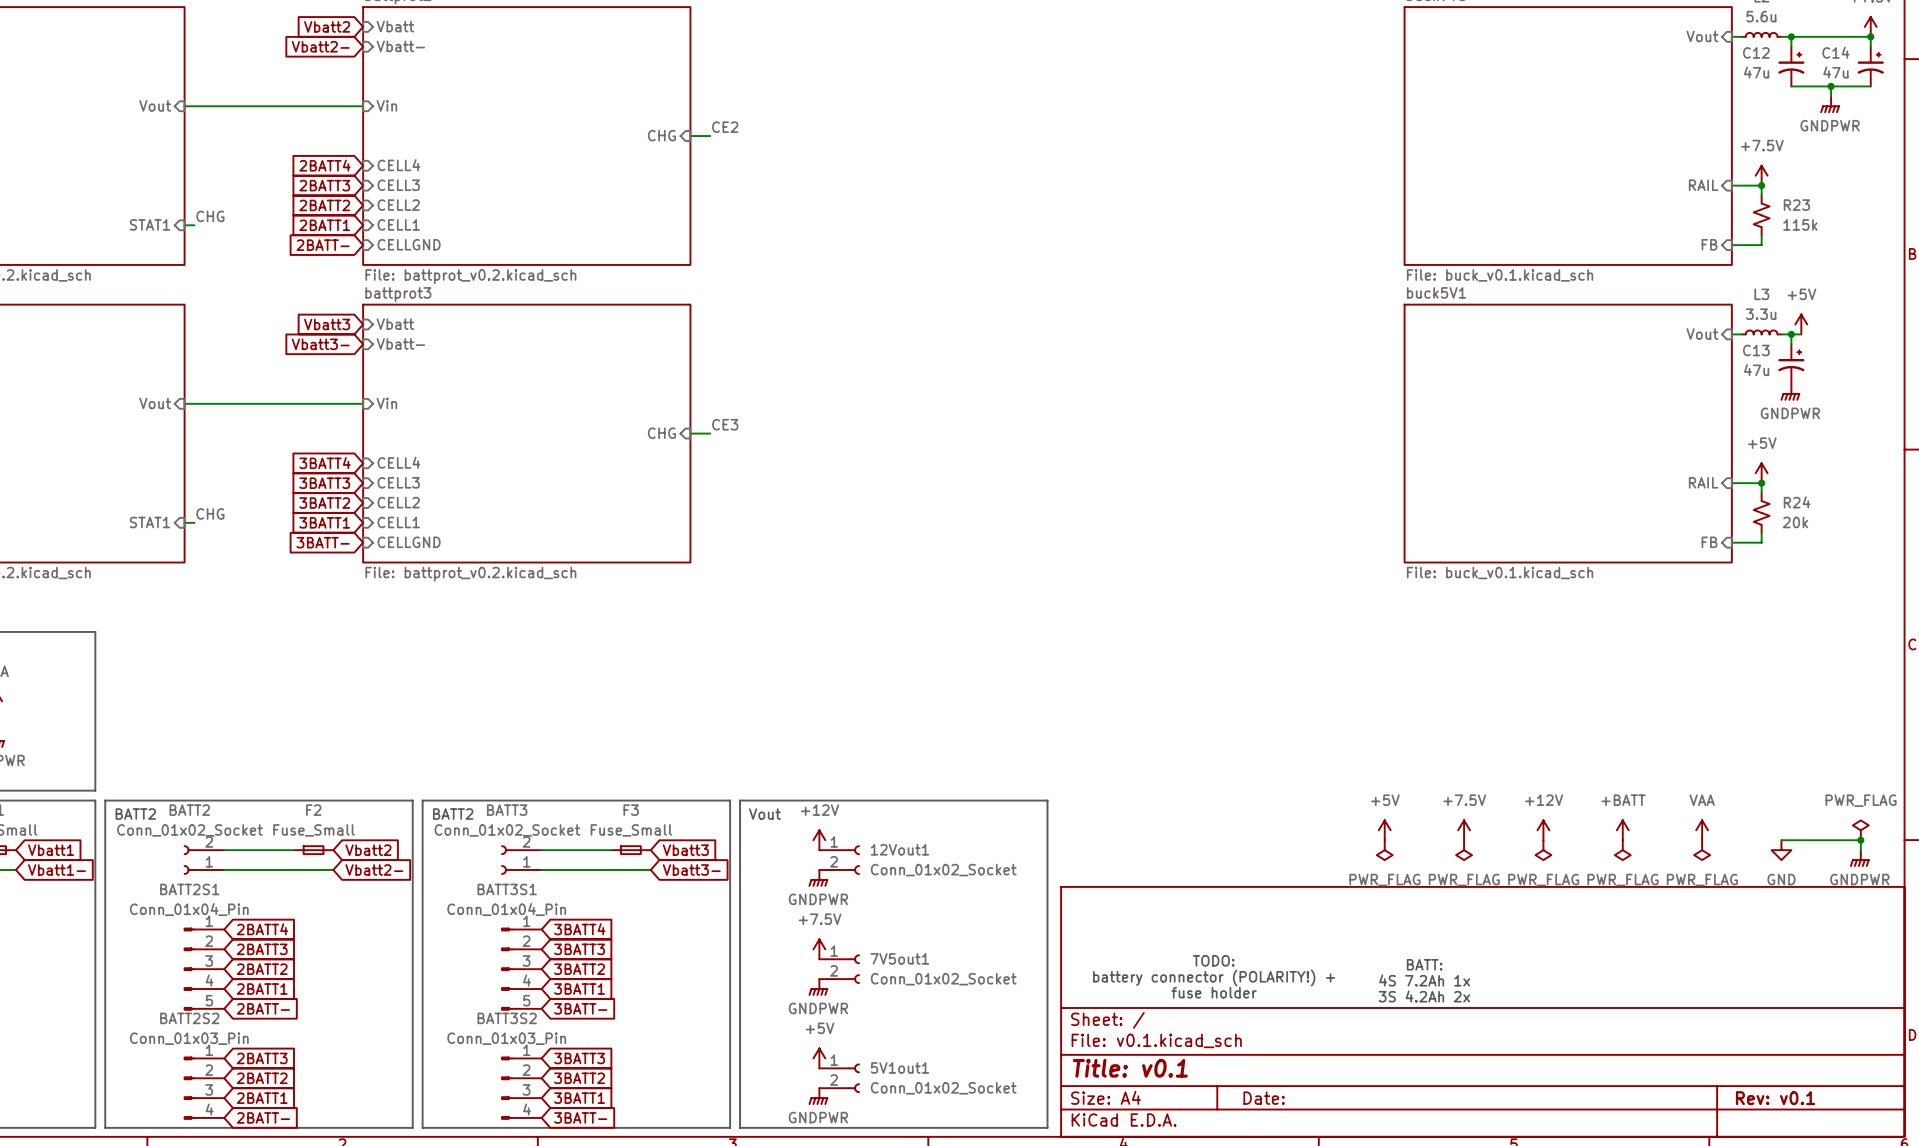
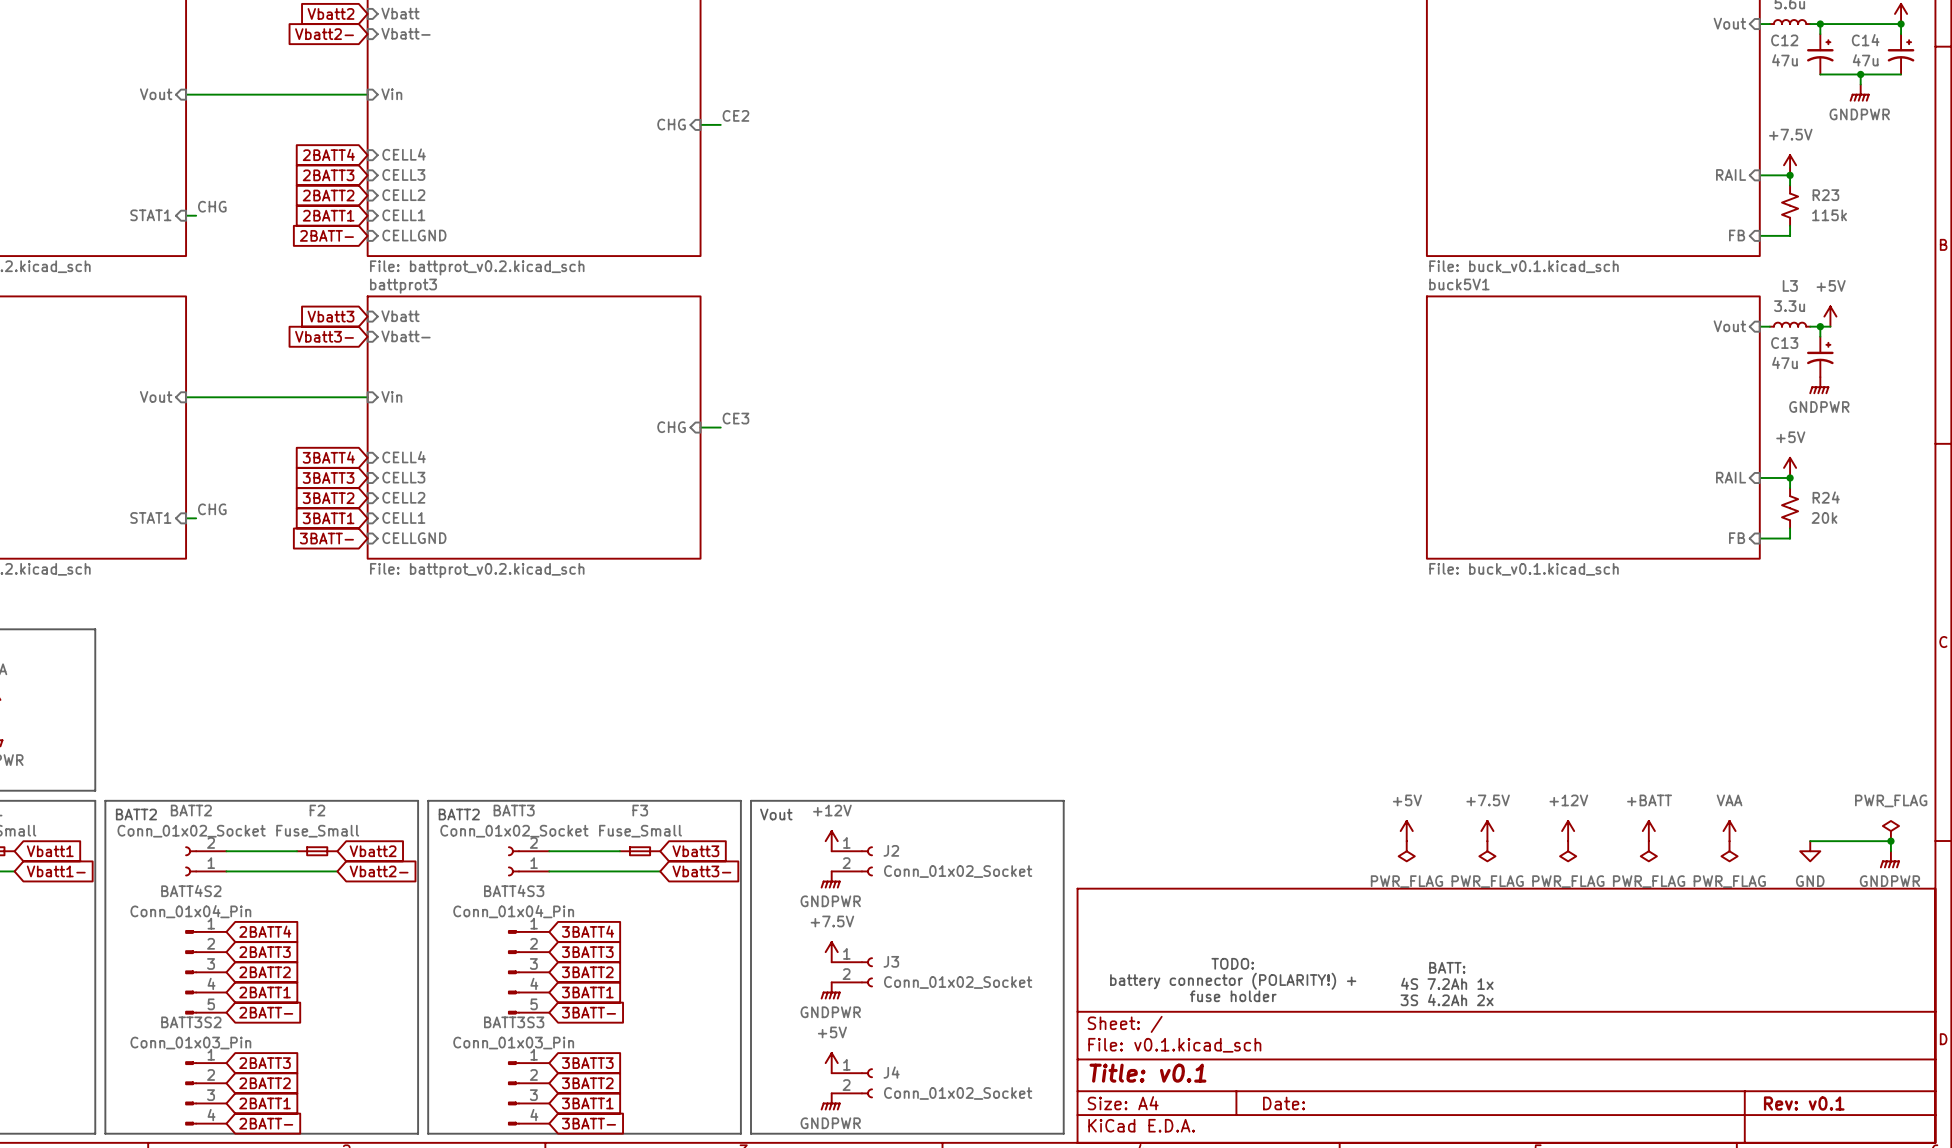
12Vout1 name: 12Vout1 (899, 849) -> J2 (891, 850)
BATT2S1 name: BATT2S1 (189, 889) -> BATT4S2 (191, 890)
BATT3S1 name: BATT3S1 (507, 889) -> BATT4S3 (514, 890)
7V5out1 name: 7V5out1 (899, 958) -> J3 (891, 961)
BATT2S2 name: BATT2S2 (189, 1018) -> BATT3S2 (191, 1022)
BATT3S2 name: BATT3S2 (507, 1018) -> BATT3S3 (514, 1022)
5V1out1 name: 5V1out1 (899, 1067) -> J4 (891, 1072)

